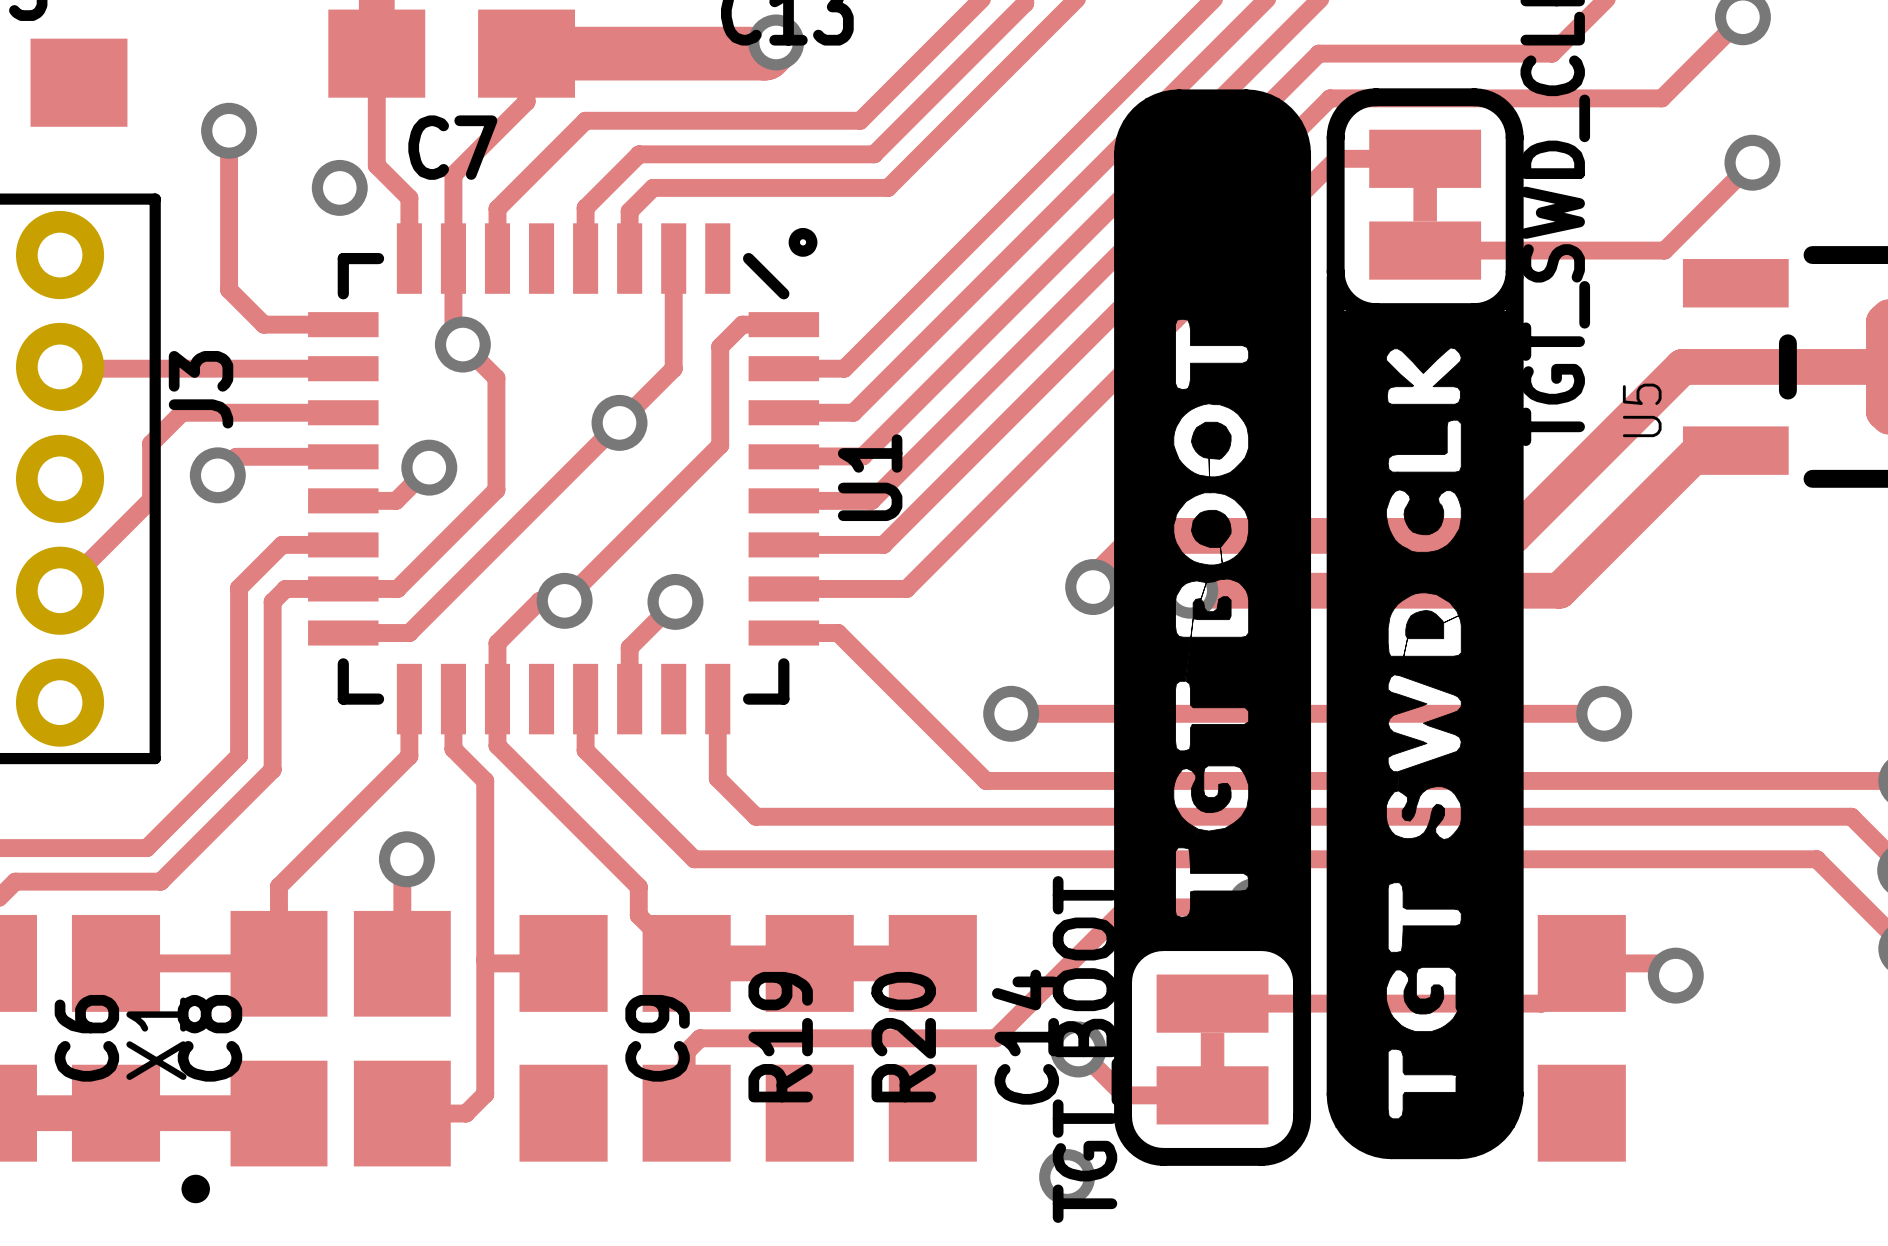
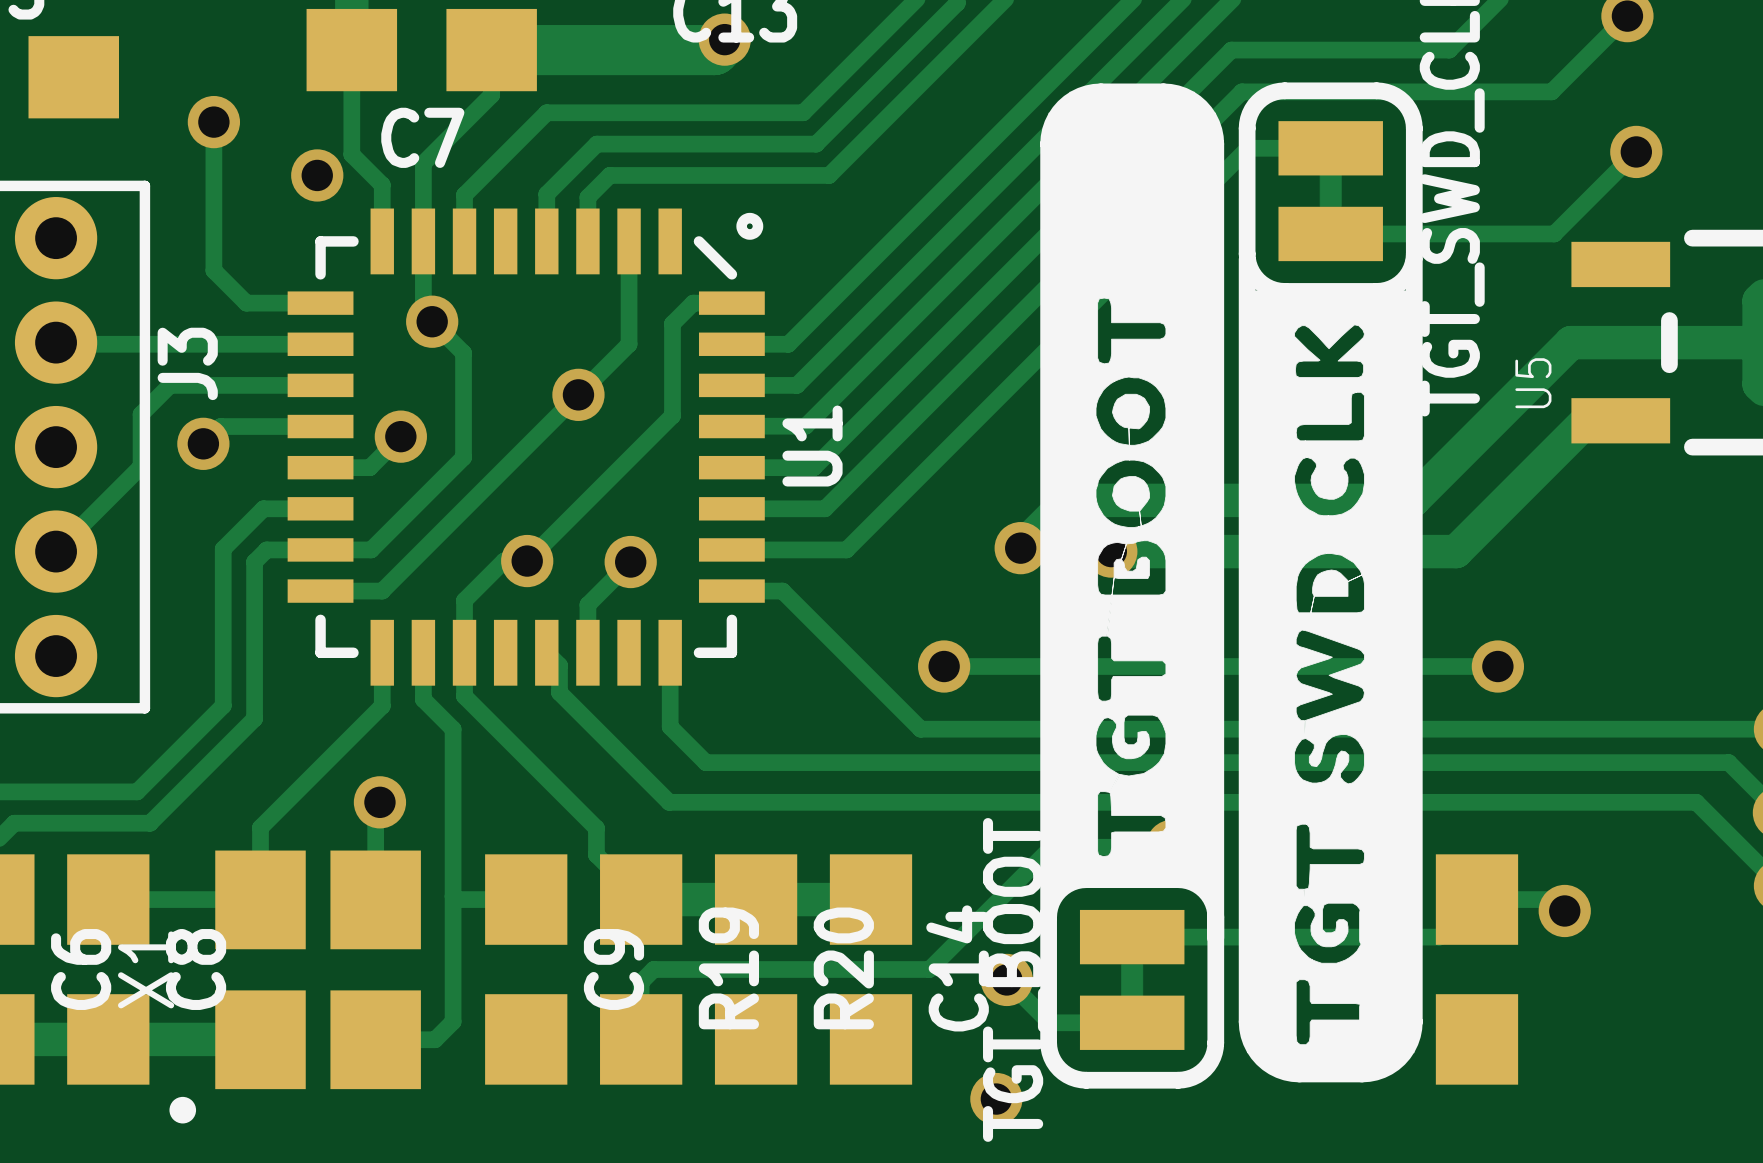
track: (585, 699) (585, 750) (694, 859) (716, 859) -> (546, 652) (559, 665) (559, 692) (669, 802)

